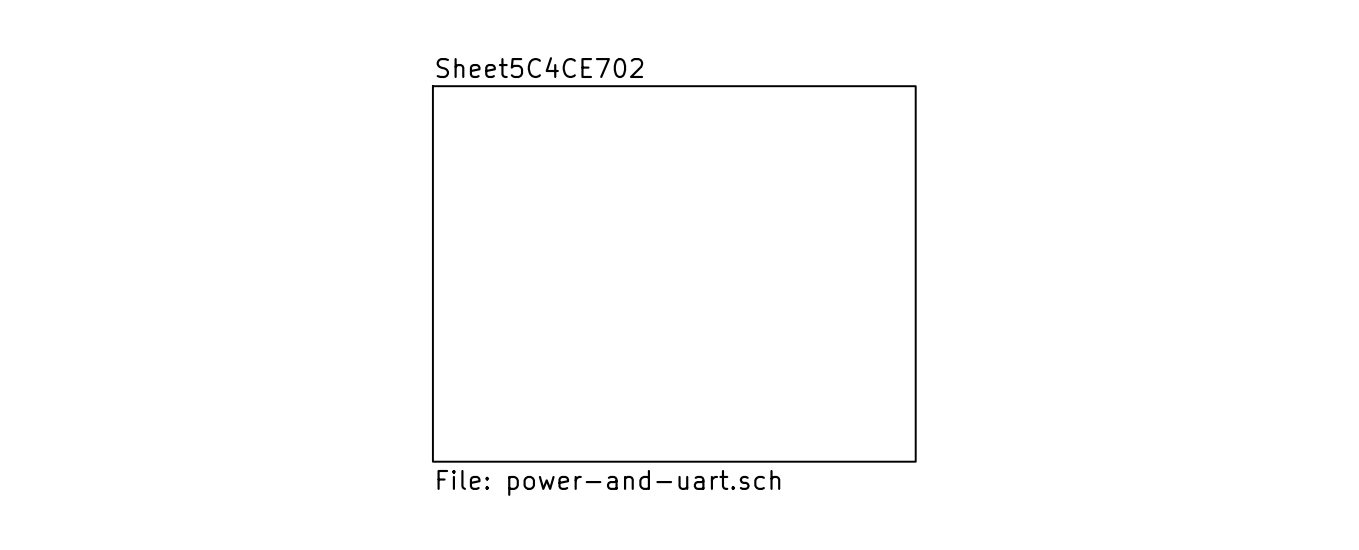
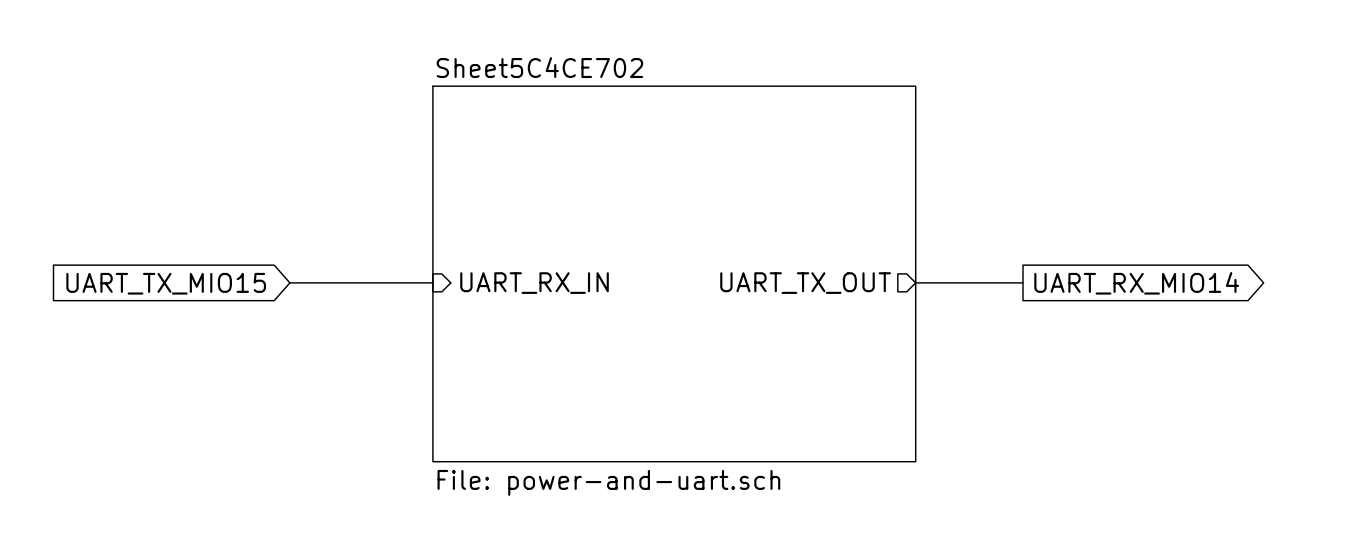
wire: none -> (289, 282) (432, 282)
wire: none -> (915, 282) (1022, 282)
global label: none -> UART_TX_MIO15 (166, 283)
sheet pin: none -> UART_RX_IN (534, 283)
sheet pin: none -> UART_TX_OUT (805, 283)
global label: none -> UART_RX_MIO14 (1136, 283)

